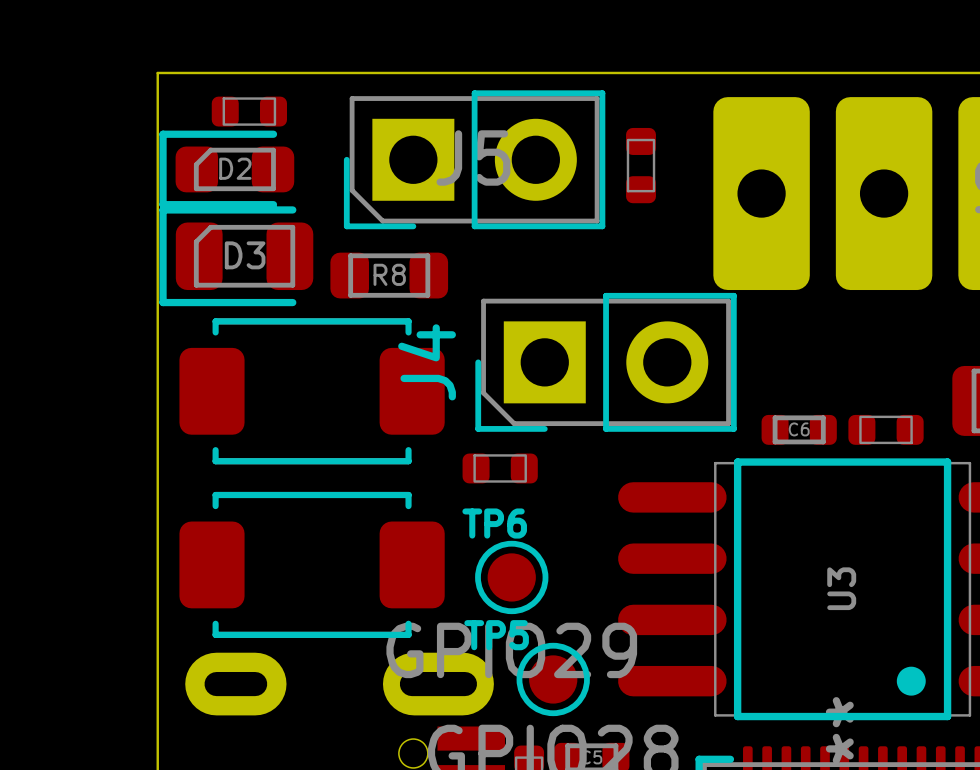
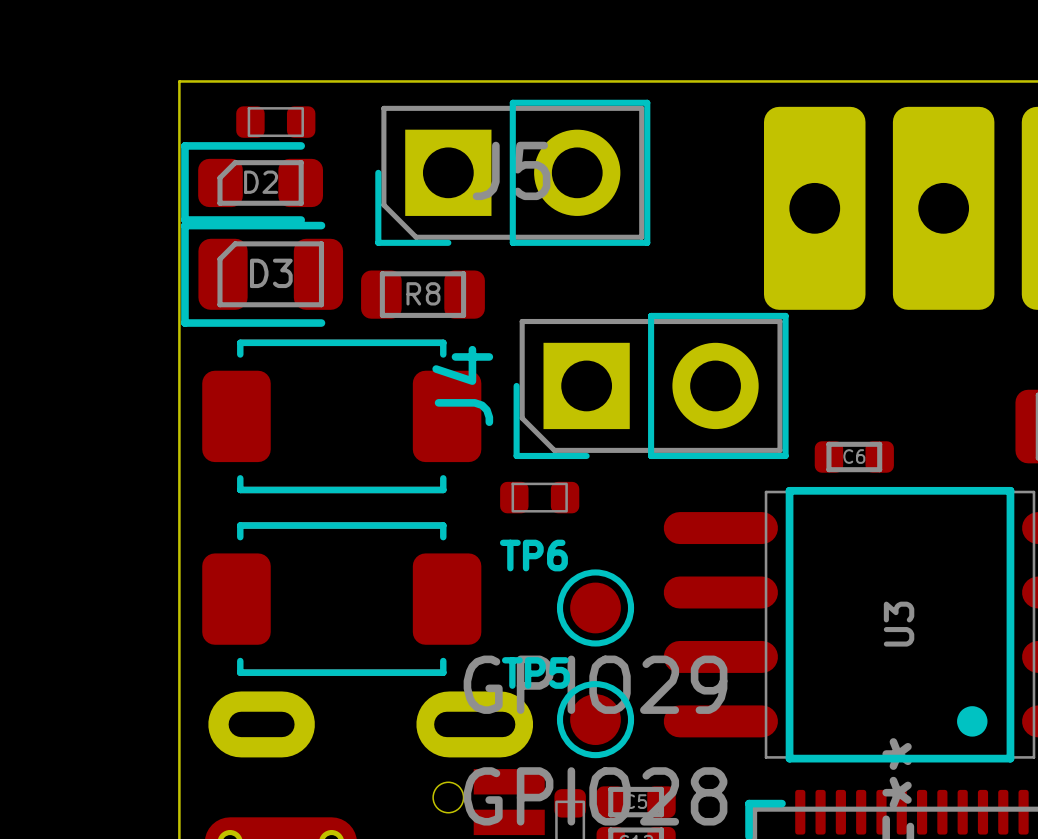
part: (641, 165) -> none
part: (886, 429) -> none
TP6 position: (511, 577) -> (595, 607)

